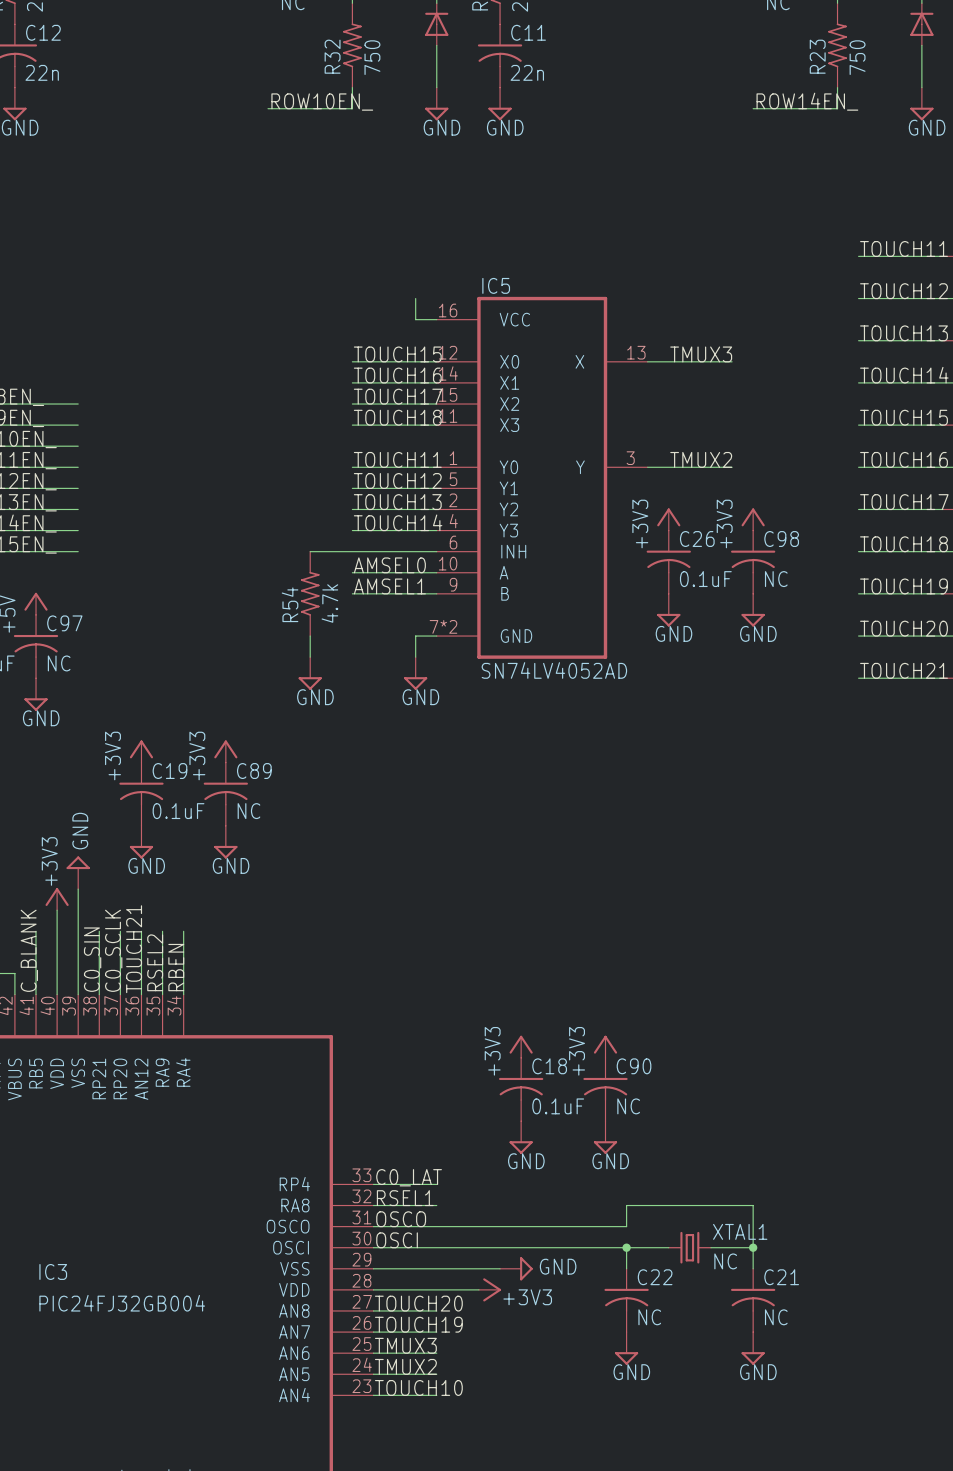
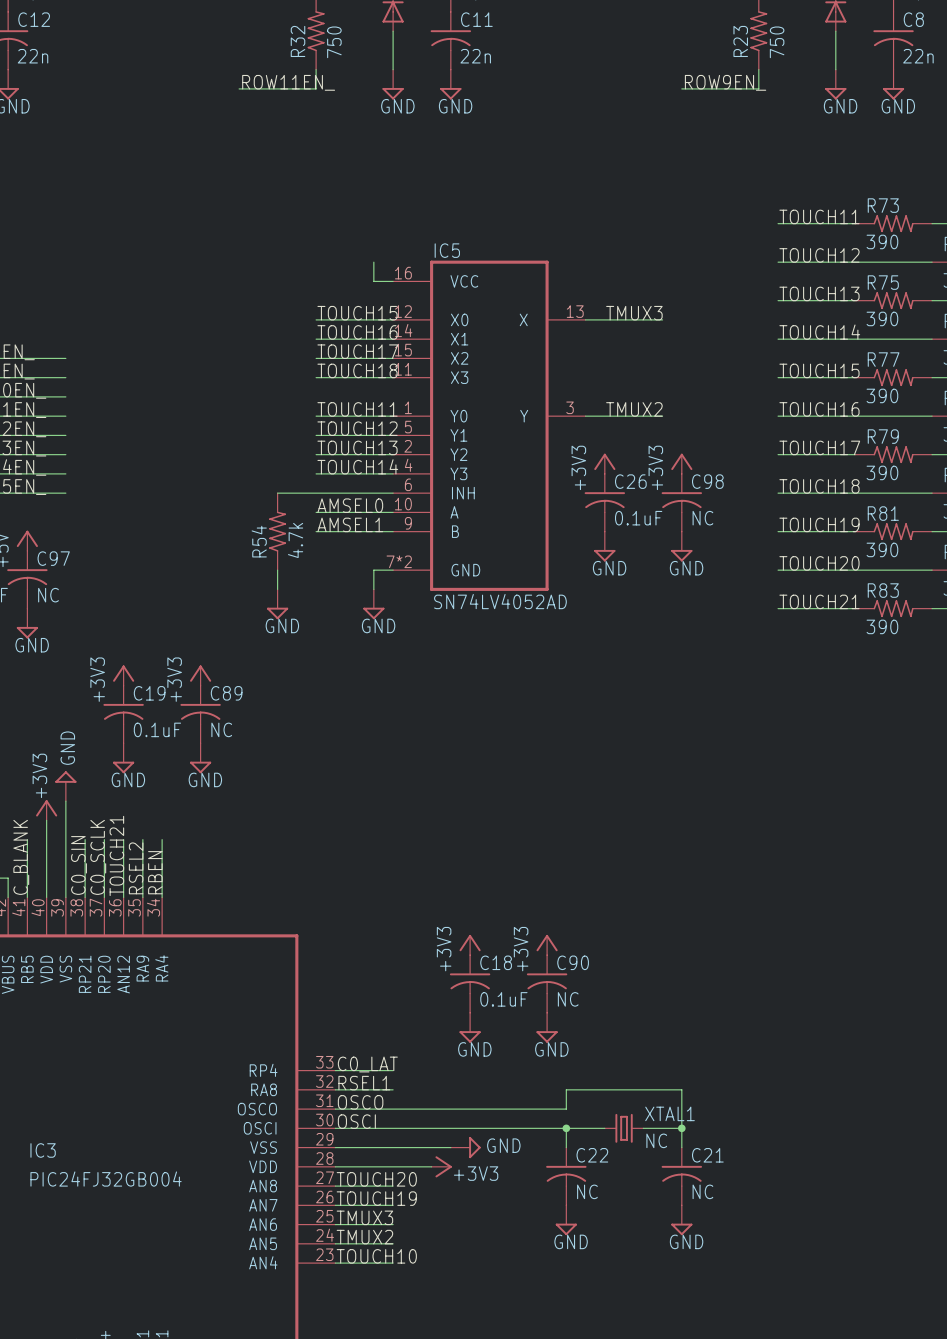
label: ROW14EN_ (807, 101) -> ROW9EN_ (725, 82)
label: ROW10EN_ (322, 102) -> ROW11EN_ (288, 82)

